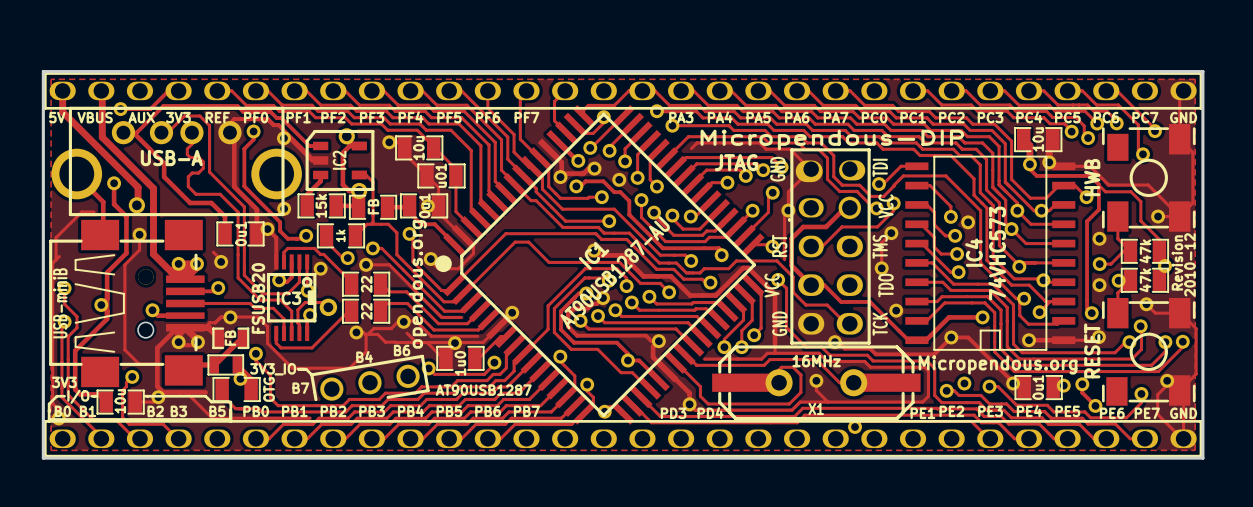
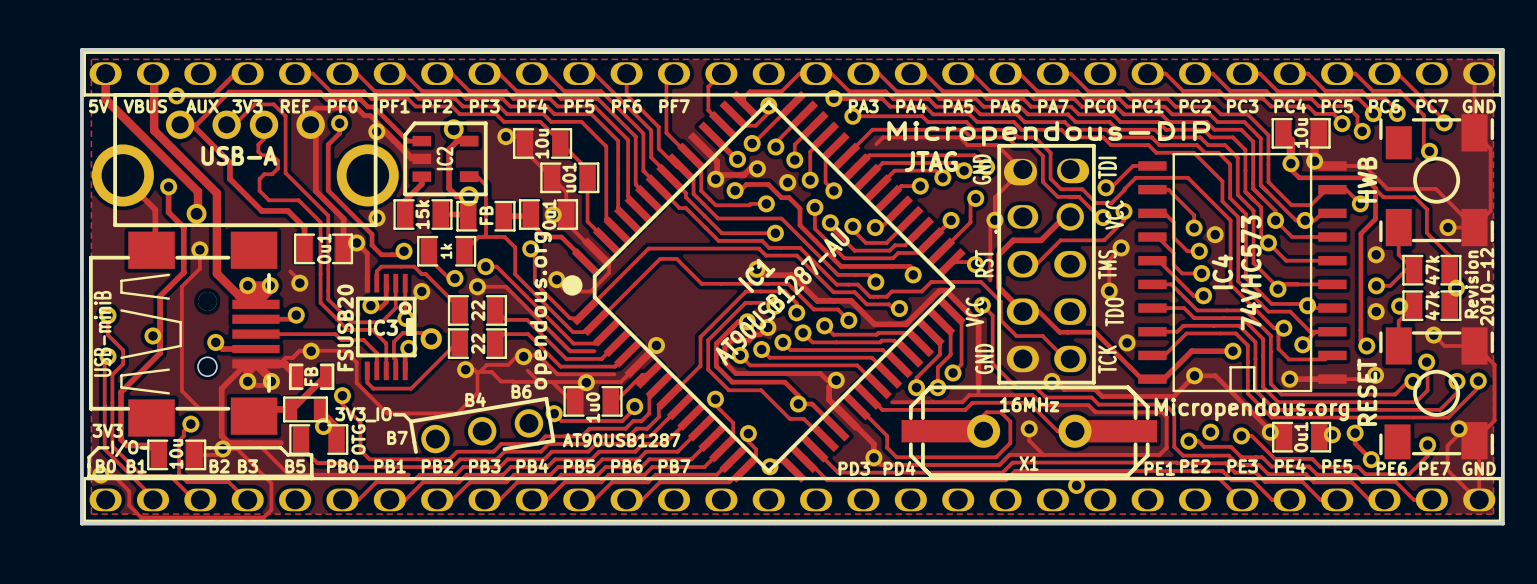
track: (93, 212) (81, 212) (56, 237) (56, 259) -> none
track: (59, 256) (52, 263) (52, 403) (58, 409) (58, 418) -> none
track: none -> (222, 448) (237, 448) (271, 483) (271, 509) (263, 517) (141, 517) (129, 505) (129, 491) (113, 475) (100, 475)

